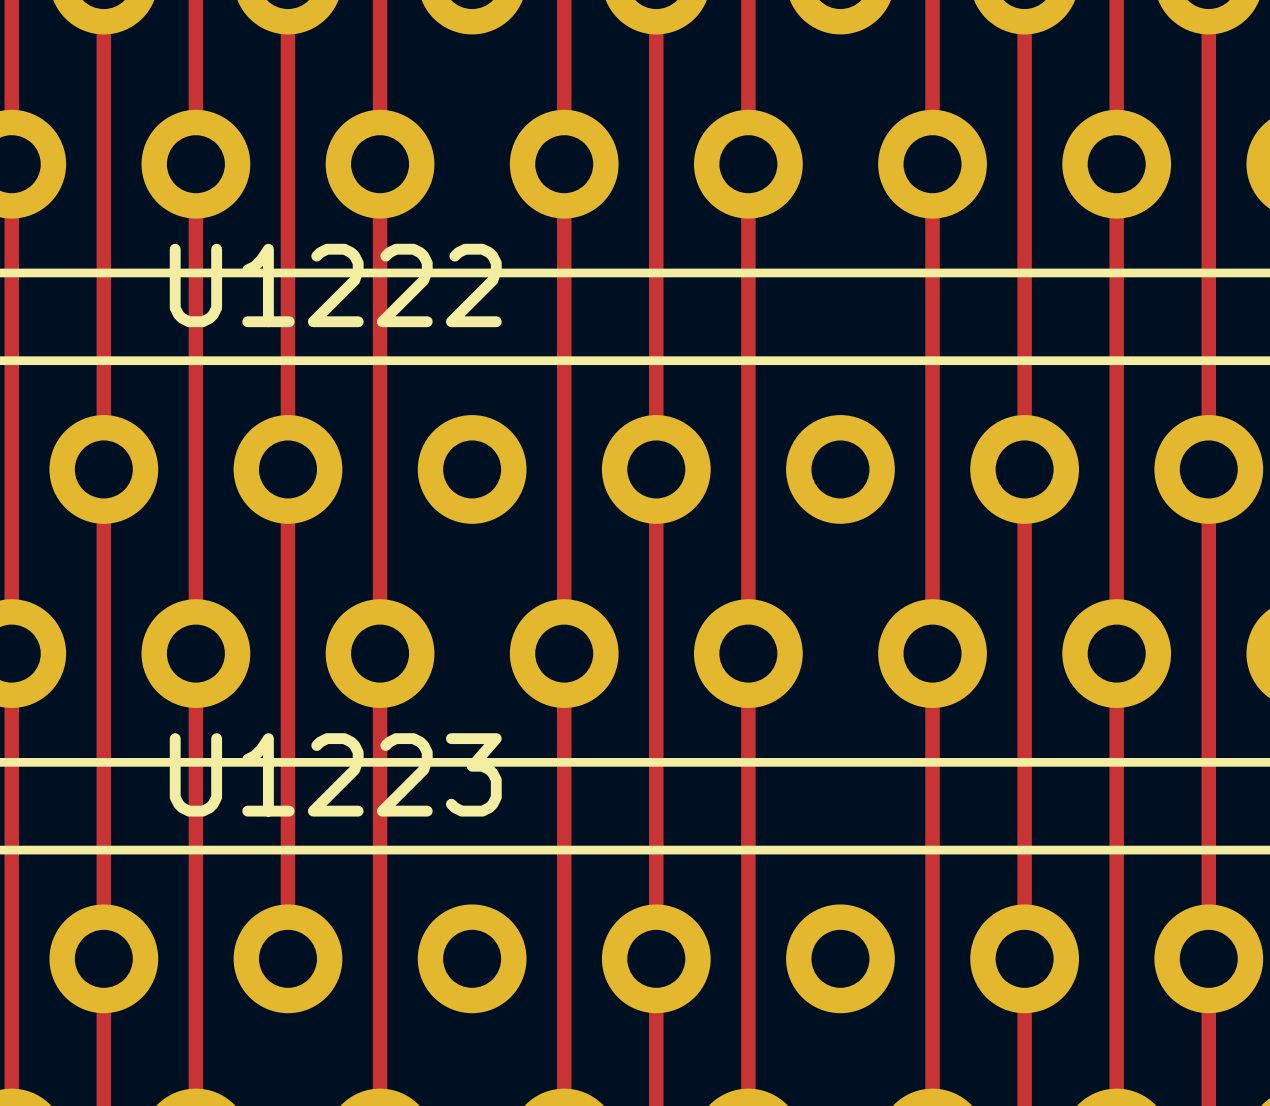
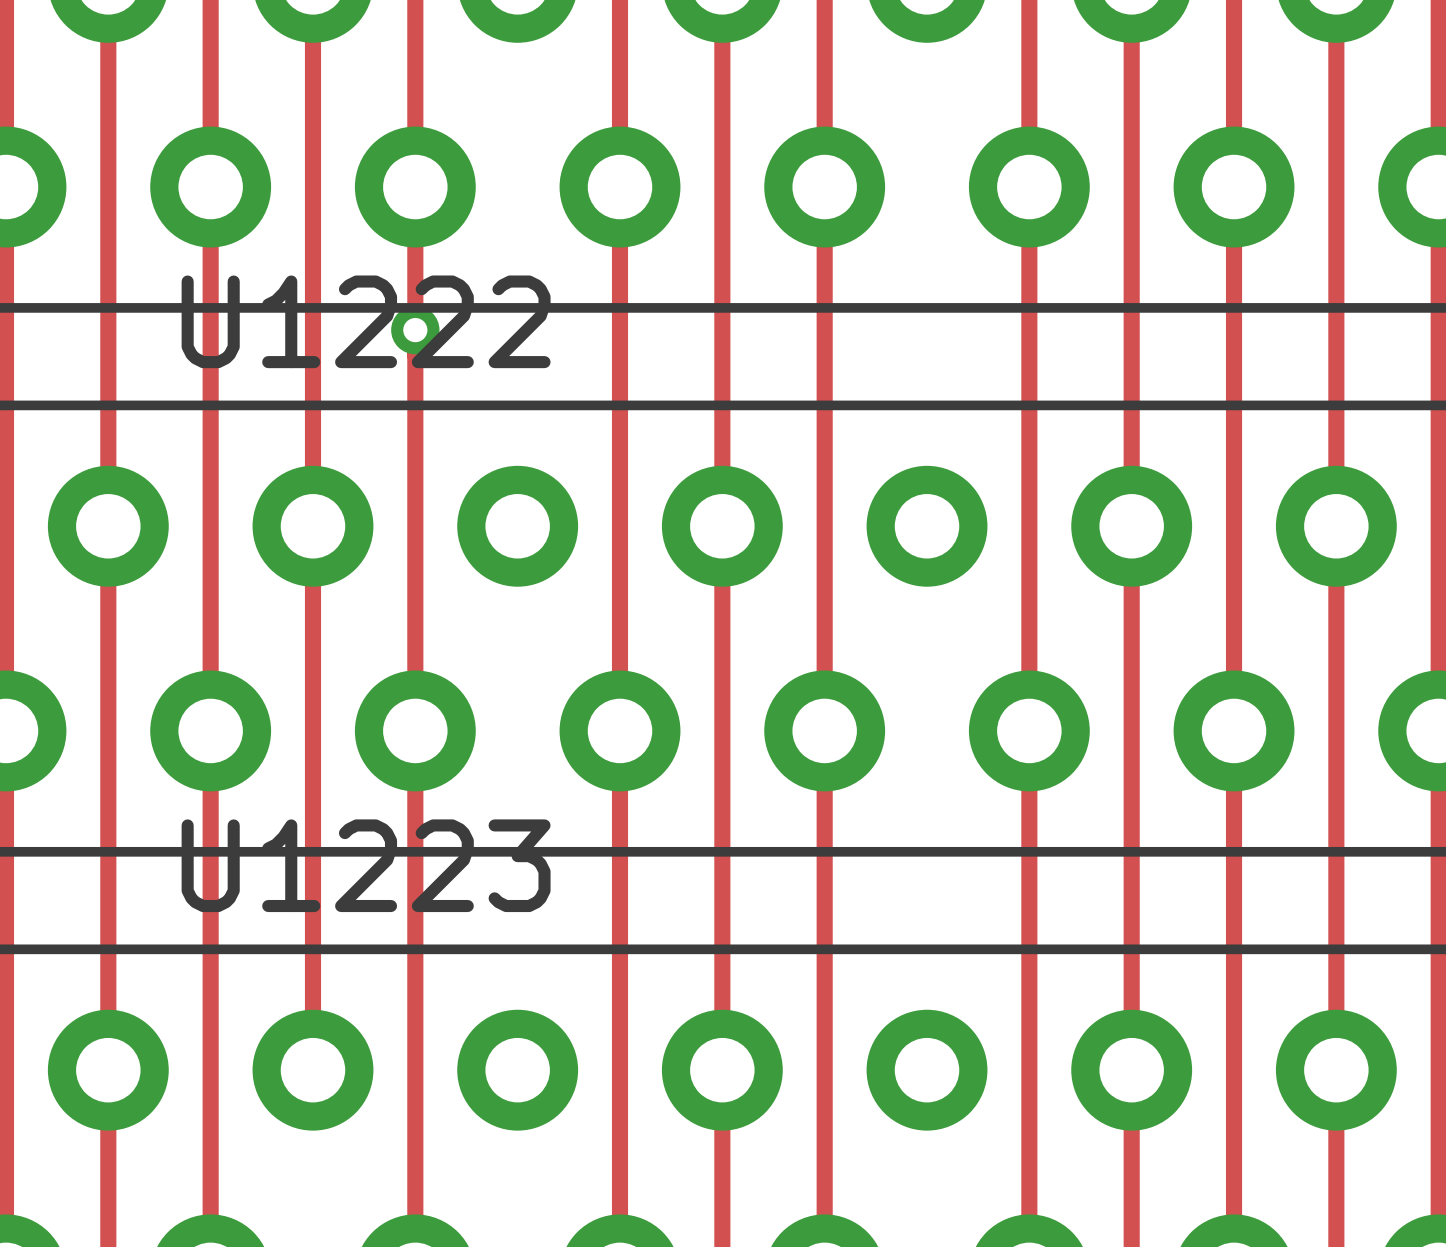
via: none -> (415, 330)

